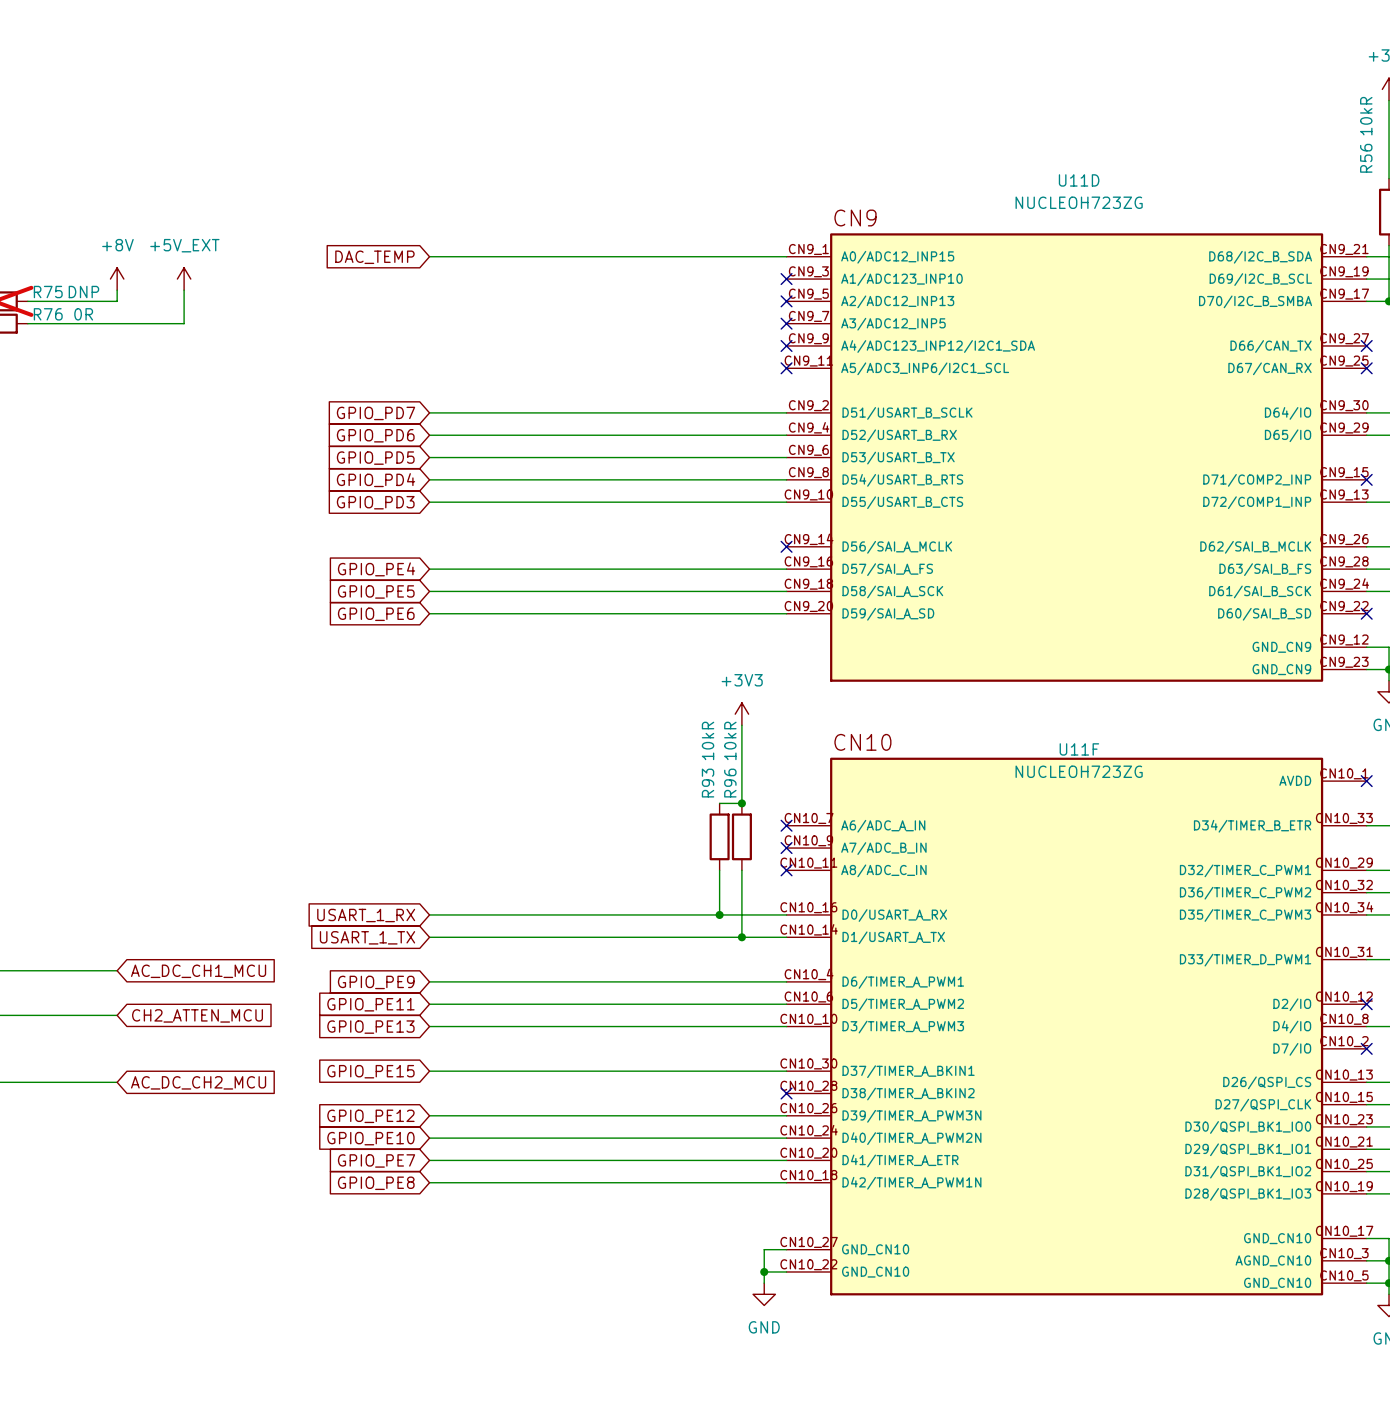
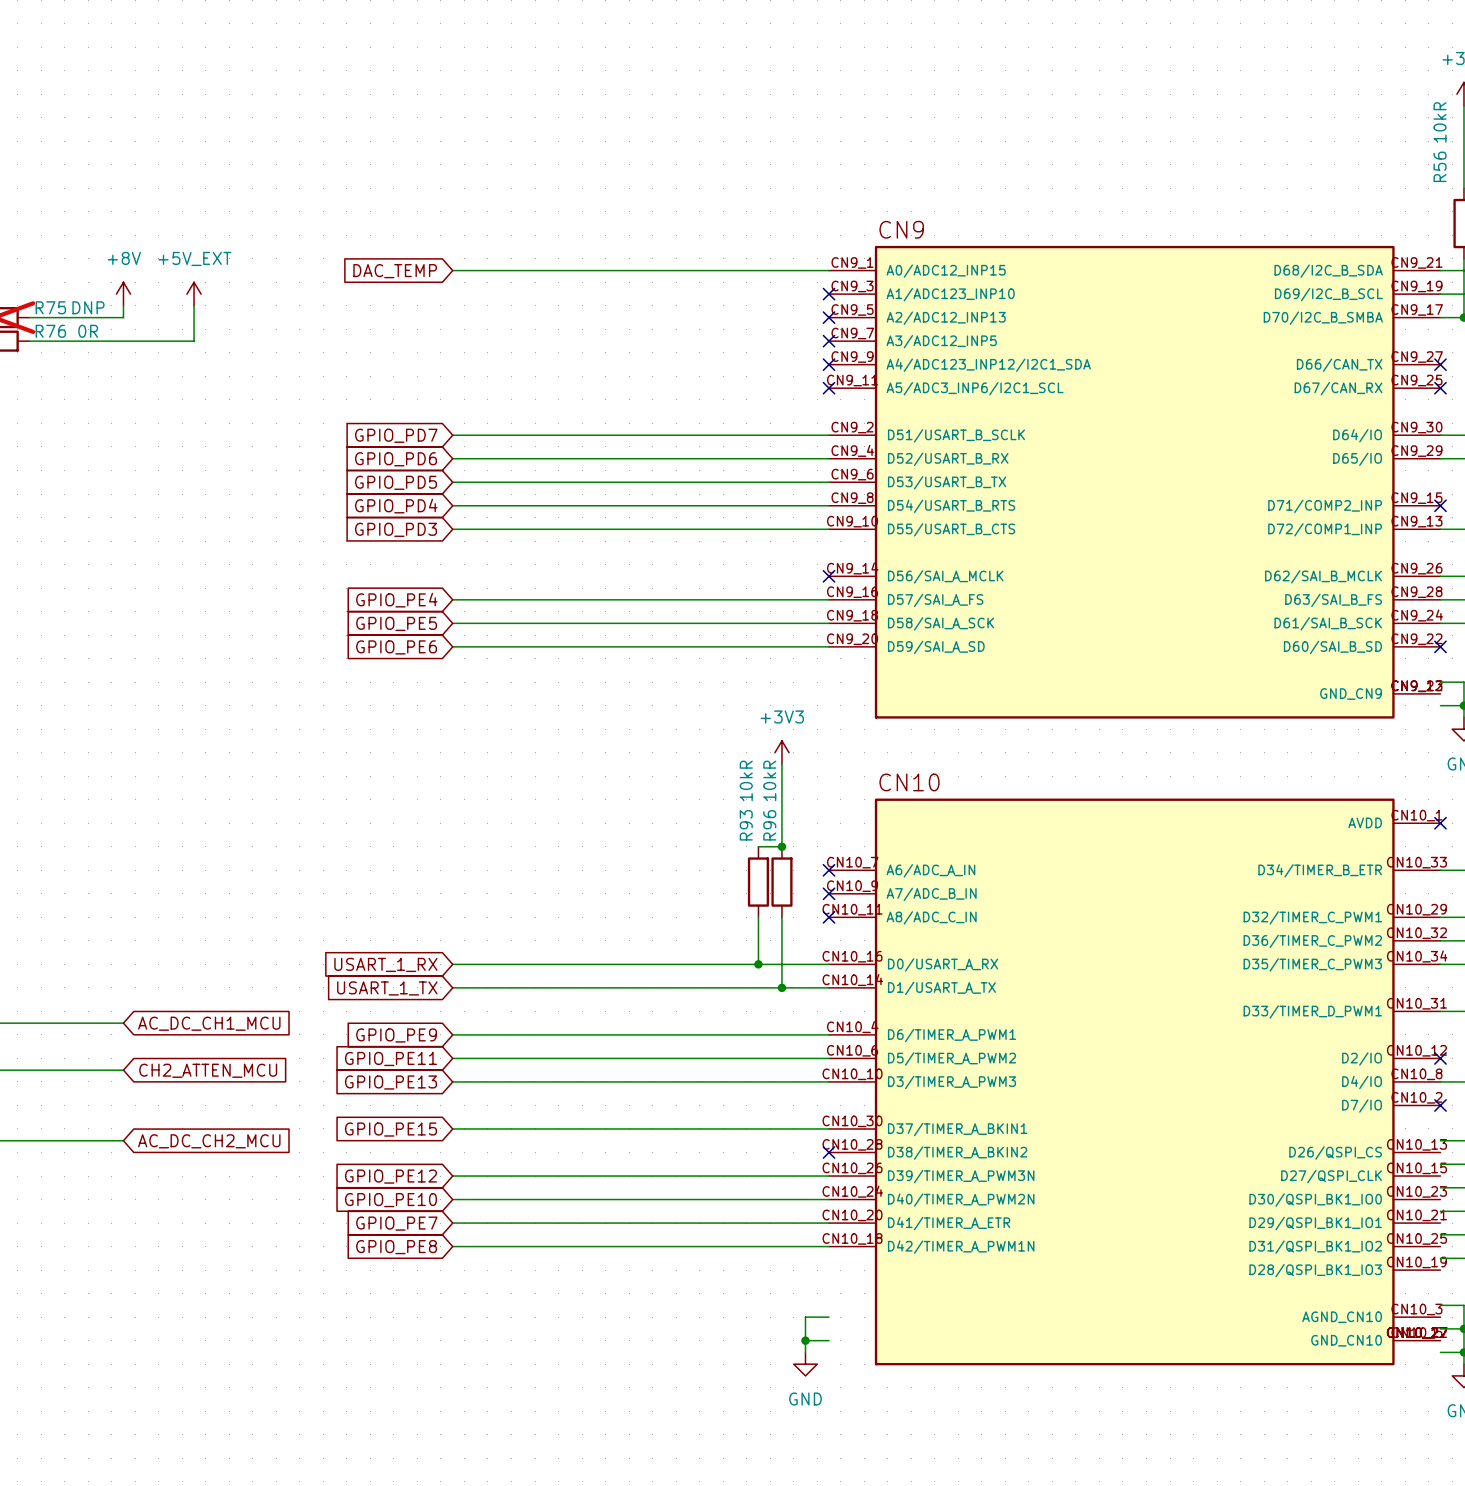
U11D: NUCLEOH723ZG (1076, 457) -> none
part: none -> (1134, 482)
U11F: NUCLEOH723ZG (1076, 1026) -> none
part: none -> (1134, 1081)

